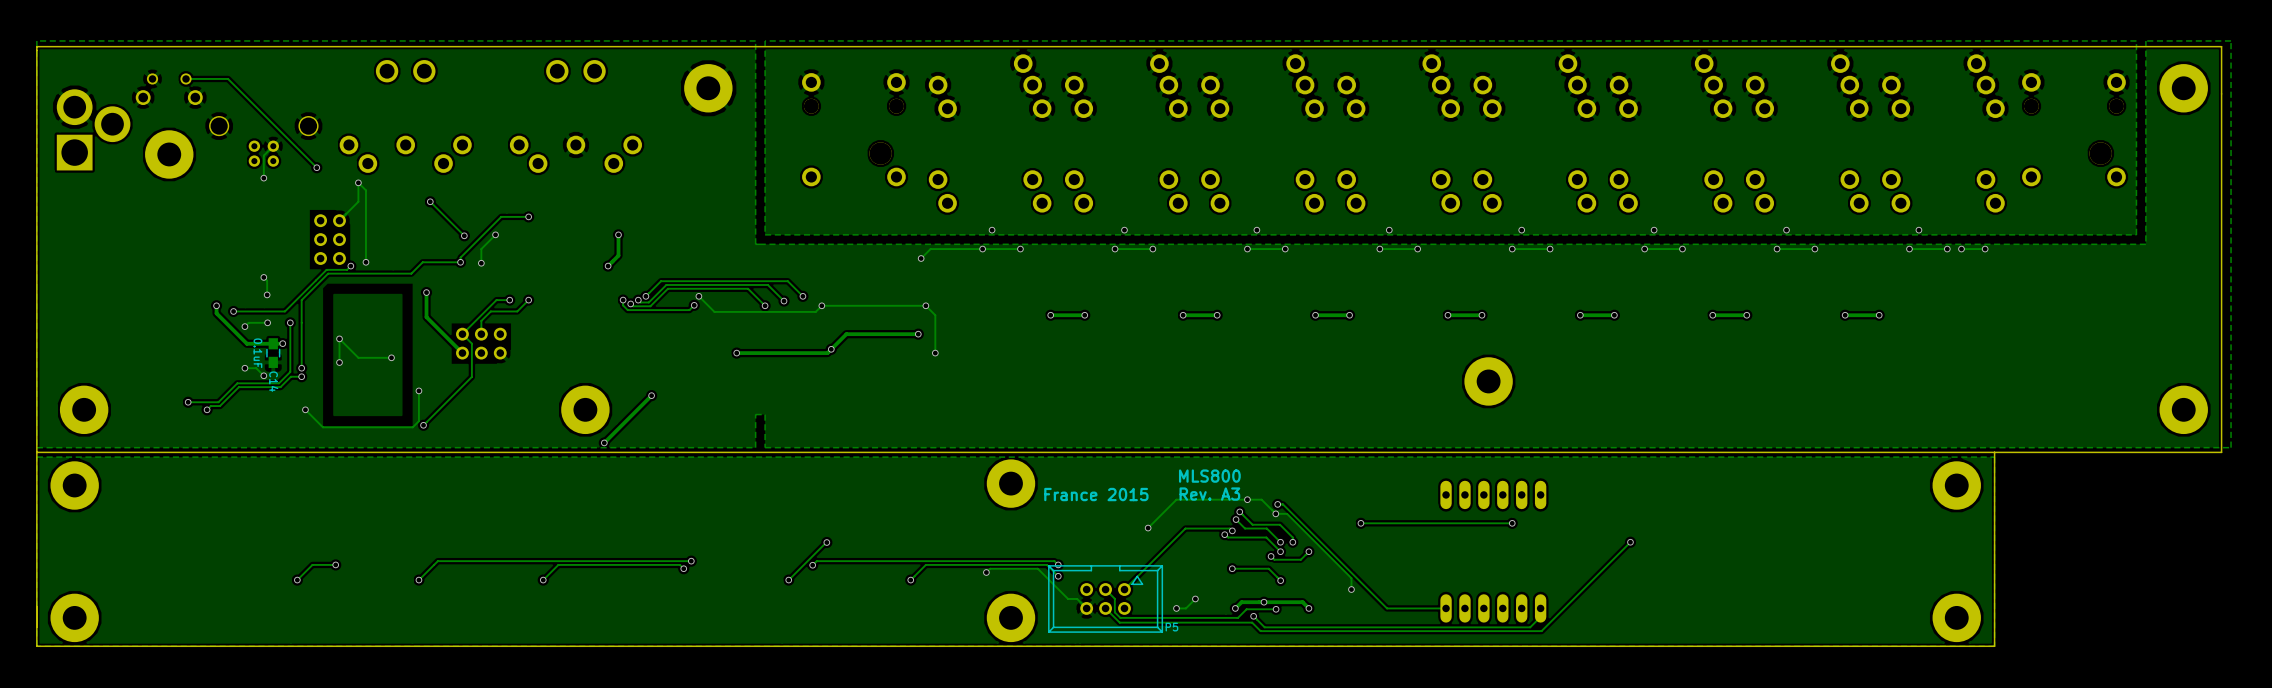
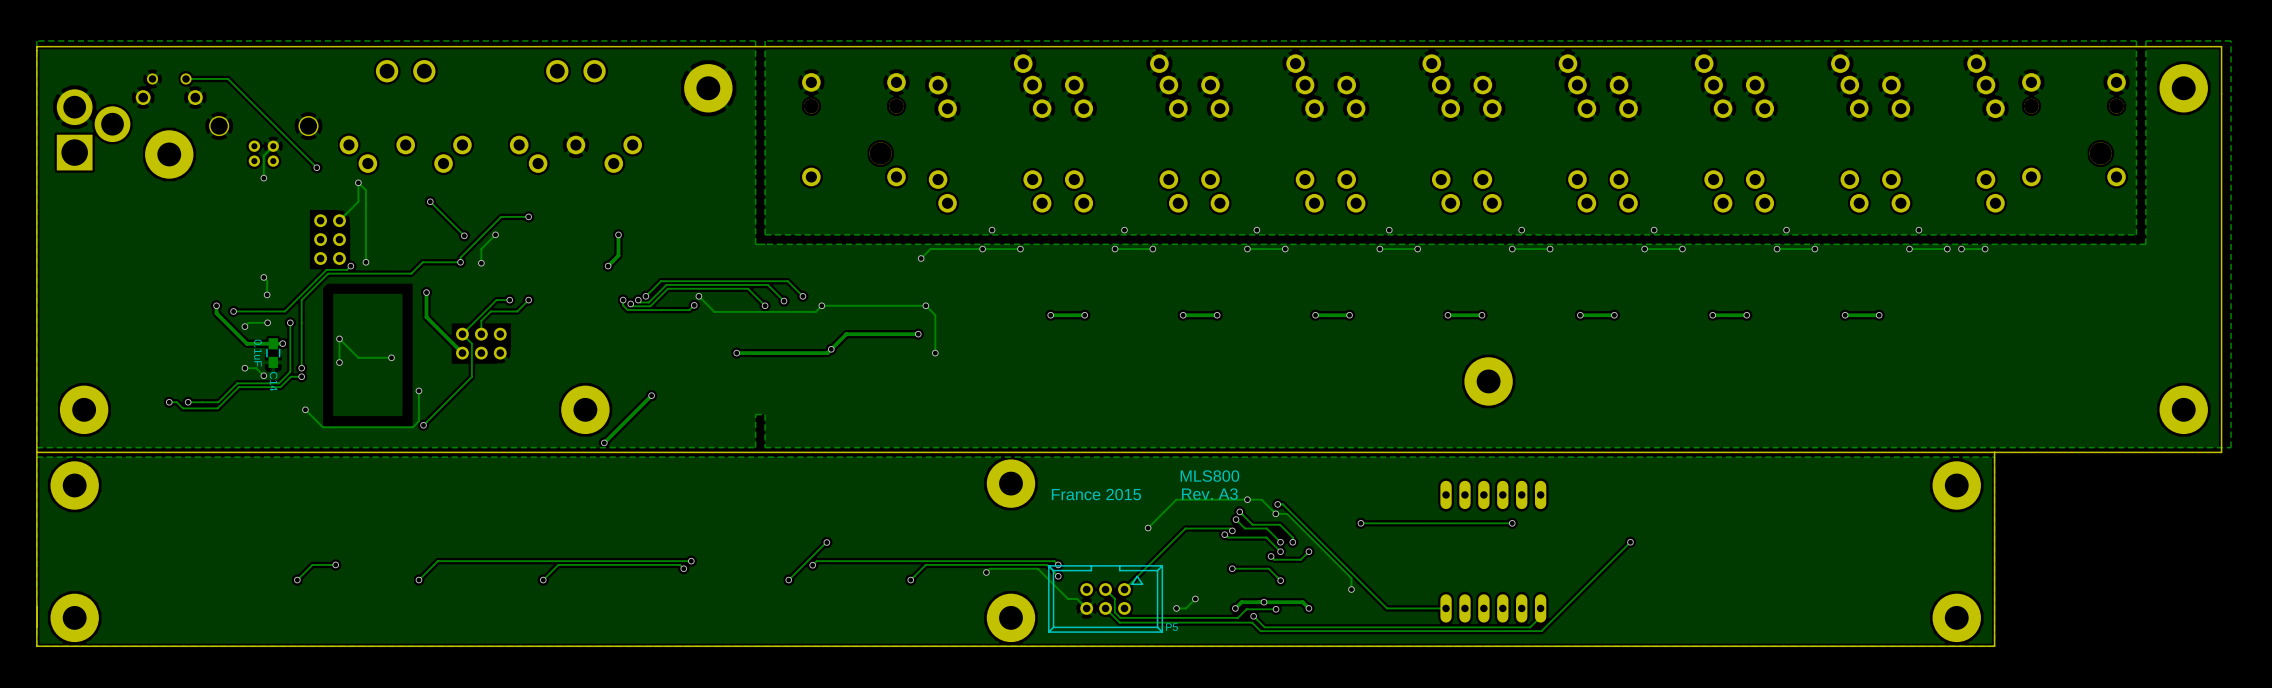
track: (220, 406) (210, 406) (207, 409) -> (220, 406) (217, 408) (182, 408) (176, 402) (169, 402)
via position: (207, 409) -> (169, 402)

